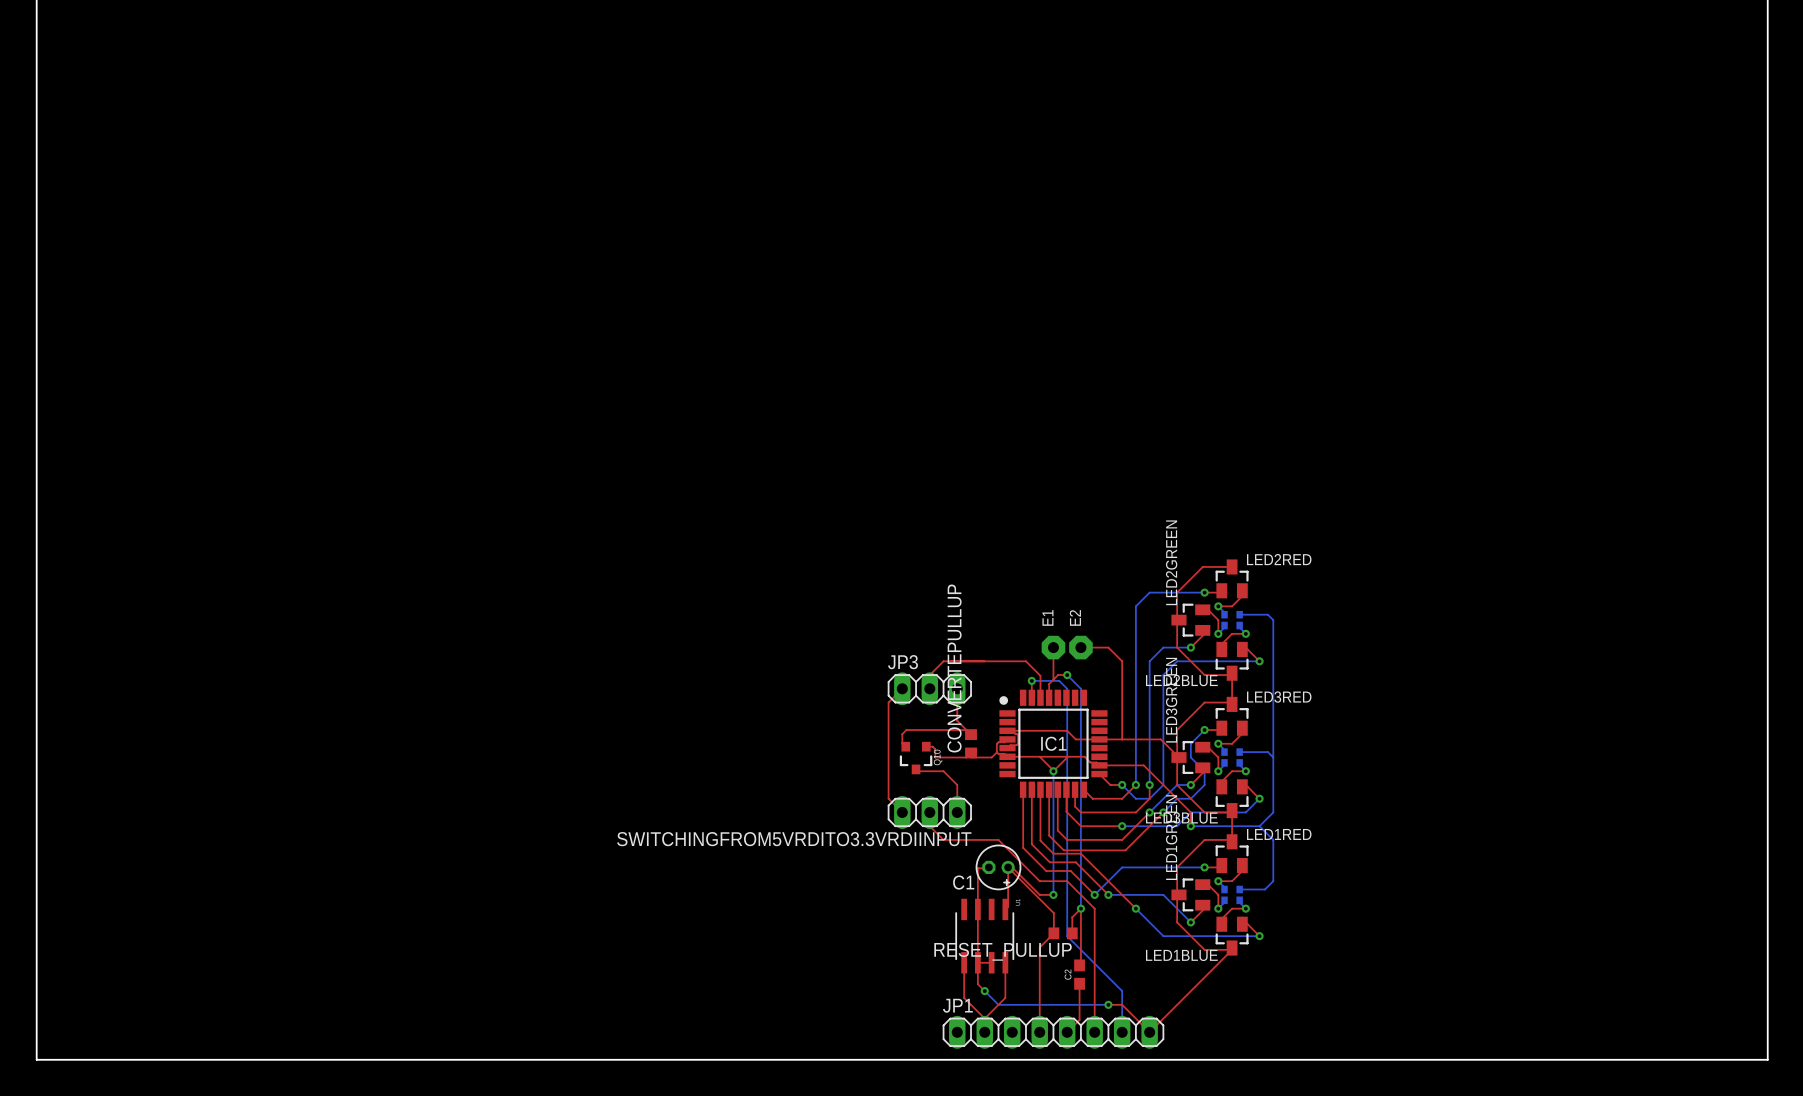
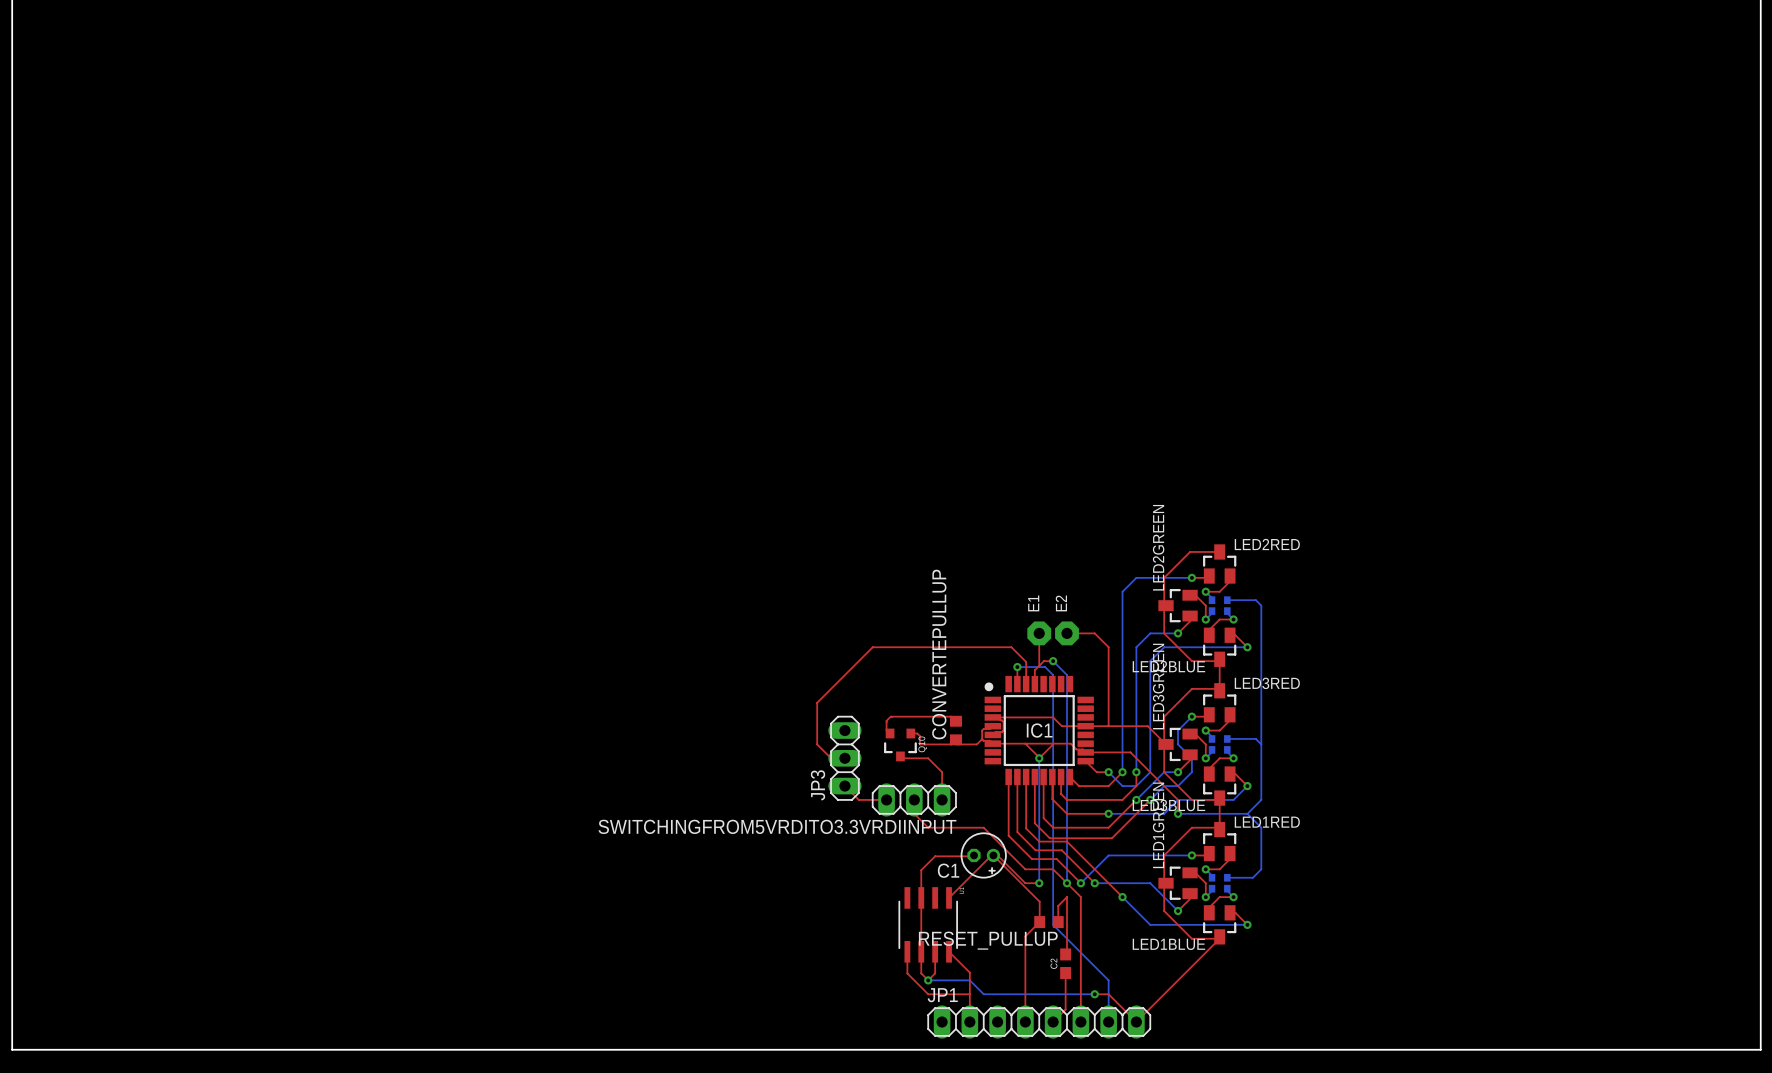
top track: (943, 661) (929, 675) (929, 688) -> (928, 647) (872, 647) (817, 702) (817, 744) (831, 758) (844, 758)
JP3 name position: JP3 (902, 662) -> JP3 (818, 785)
top track: (902, 688) (888, 702) (888, 798) (902, 812) -> (844, 786) (858, 799) (886, 799)
JP3 rotation: 0° (929, 688) -> 90° clockwise (844, 758)
JP3 position: (929, 688) -> (844, 758)
top track: (957, 688) (957, 720) (966, 730) -> none
top track: (1008, 867) (1008, 906) (1005, 909) -> (993, 855) (949, 897)
top track: (977, 868) (977, 984) (984, 991) -> (962, 856) (935, 856) (921, 870) (921, 951)
bottom track: (1080, 894) (1080, 908) -> none
via position: (1080, 908) -> (1067, 883)
part position: (984, 936) -> (928, 924)
top track: none -> (907, 951) (907, 973) (928, 994) (969, 994)
top track: none -> (935, 951) (935, 973) (928, 980) (921, 973) (921, 959)
top track: (964, 962) (964, 997) (984, 1018) (1005, 997) (1005, 962) -> (949, 951) (969, 972) (969, 1008)
top track: (977, 962) (991, 962) -> none
bottom track: none -> (928, 980) (969, 980)
via position: (984, 991) -> (928, 980)

